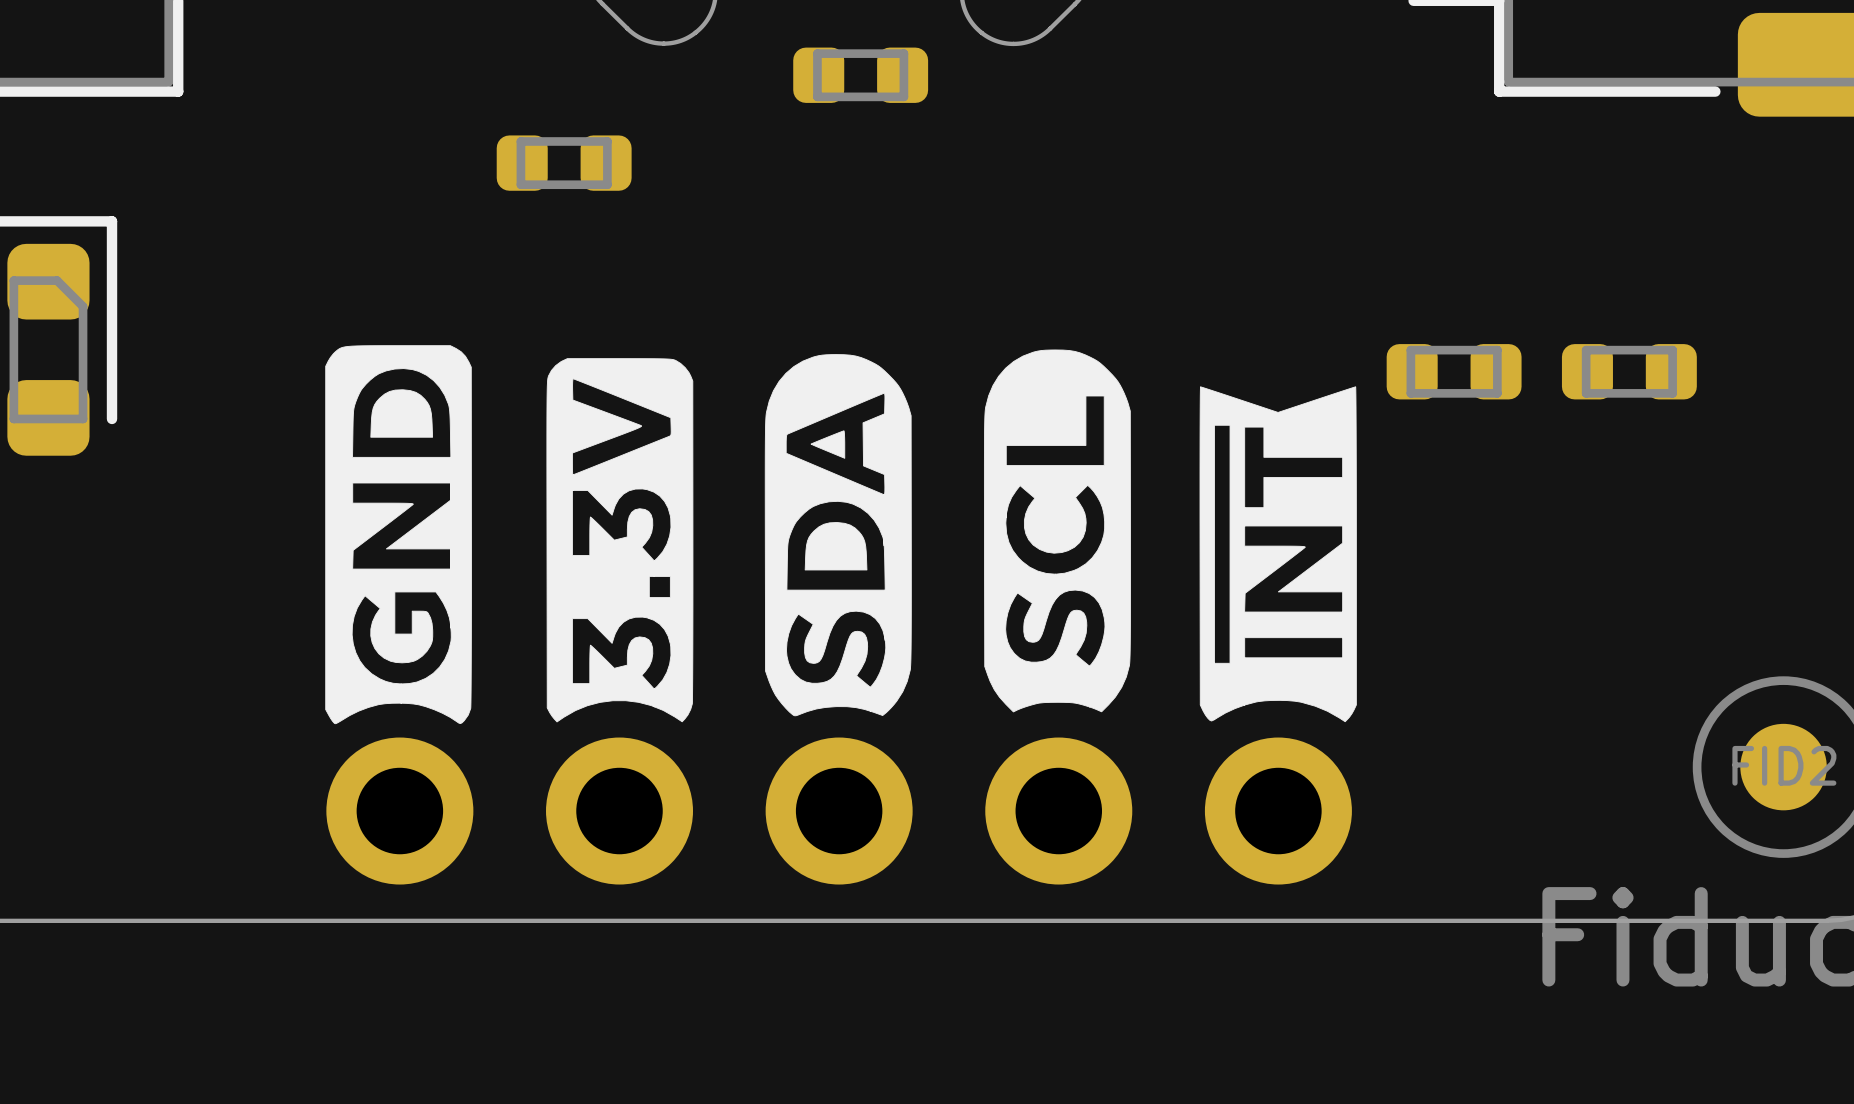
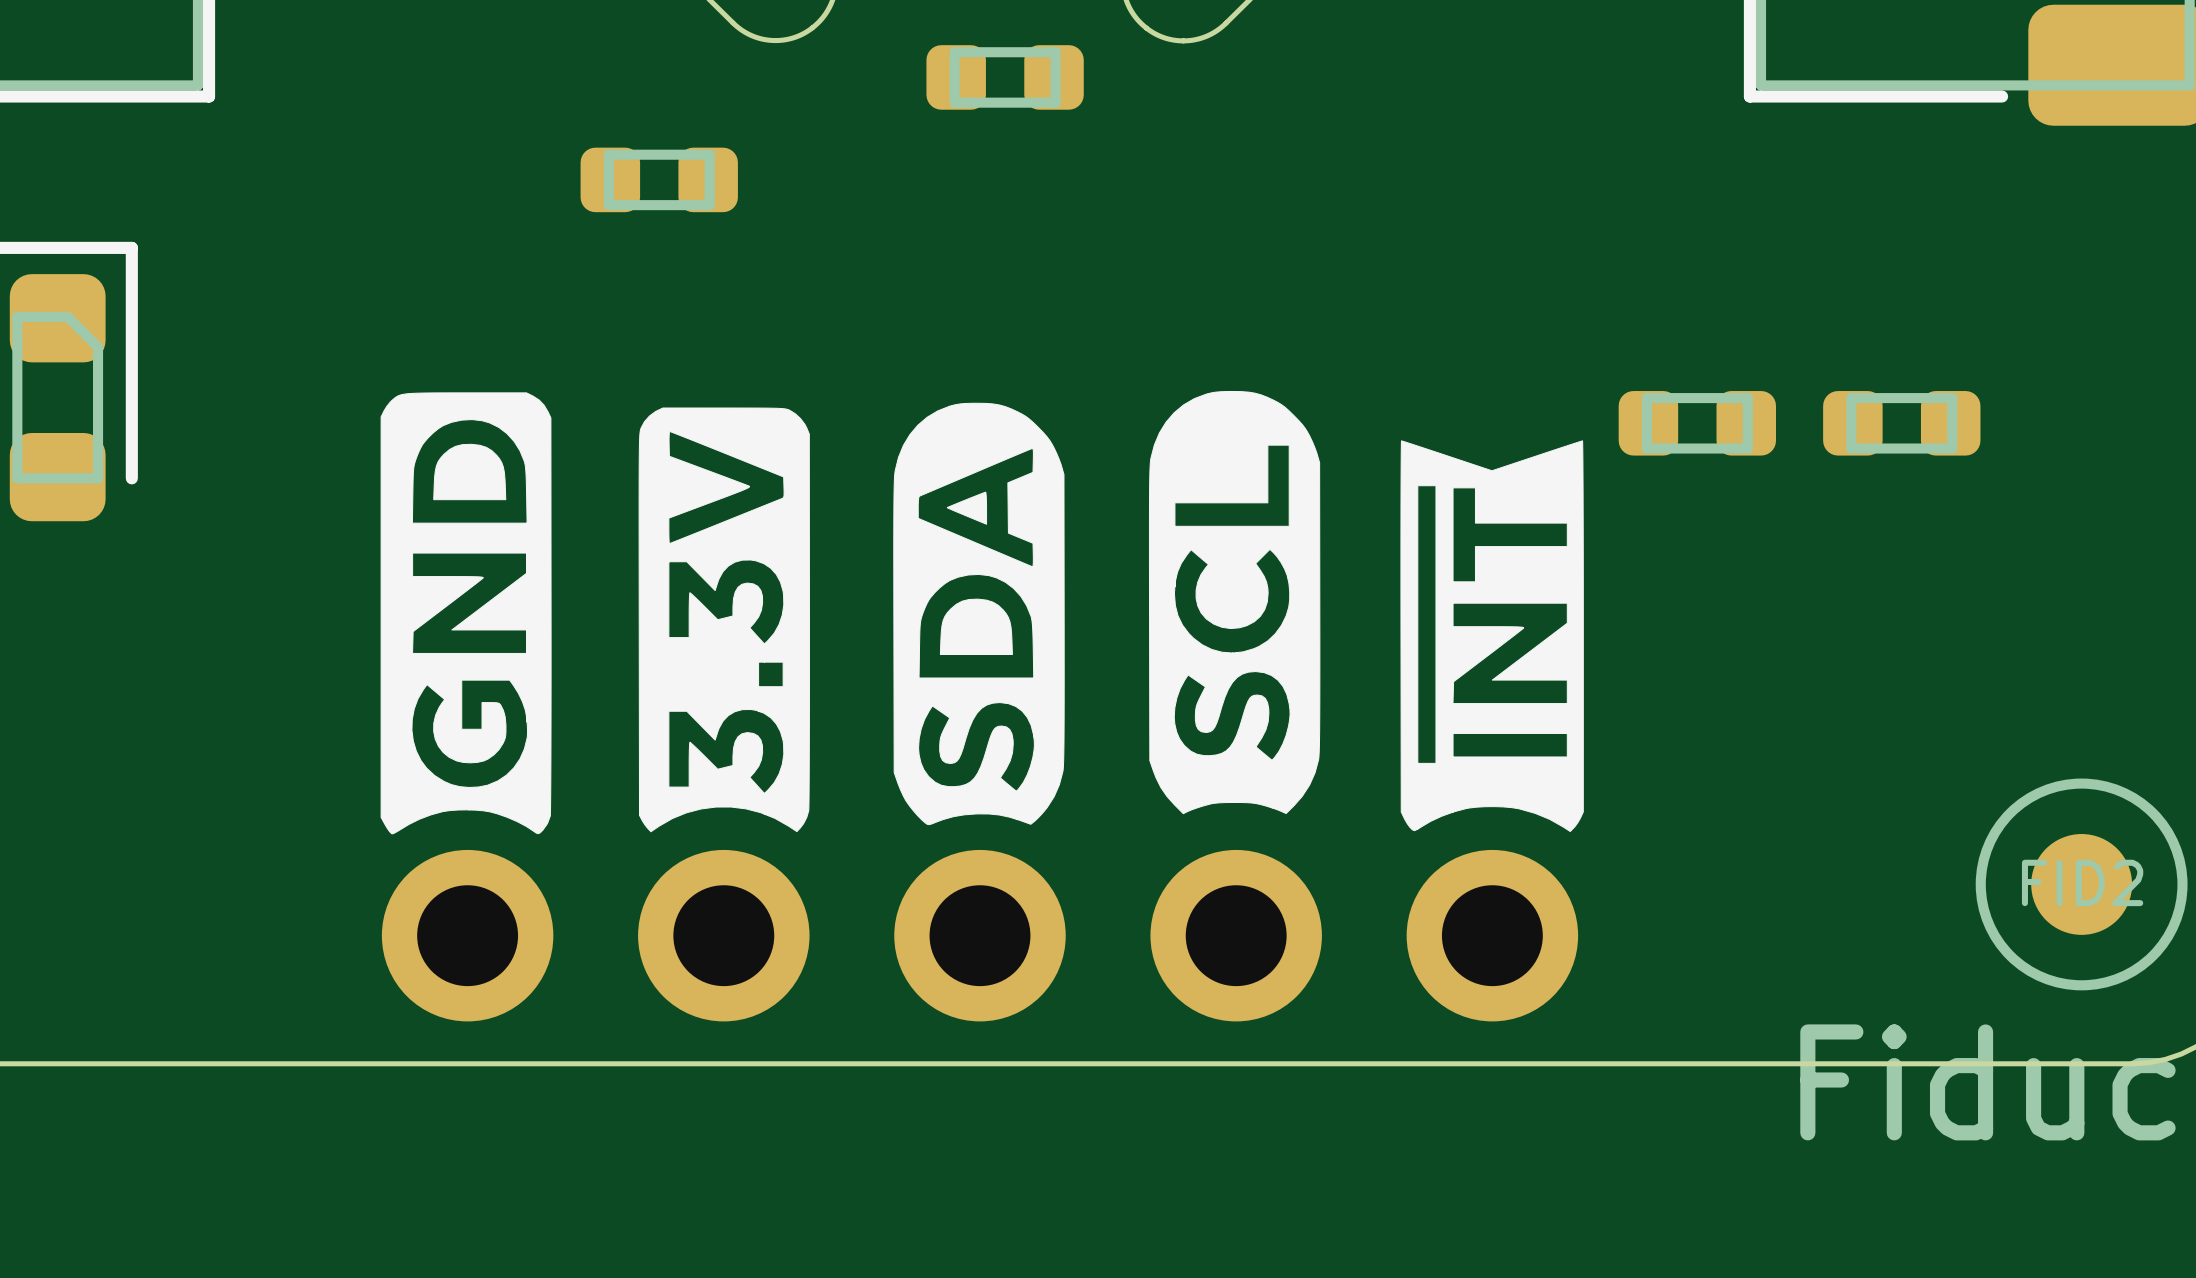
part footprint: [325, 345, 1357, 885] -> [380, 390, 1584, 1022]

